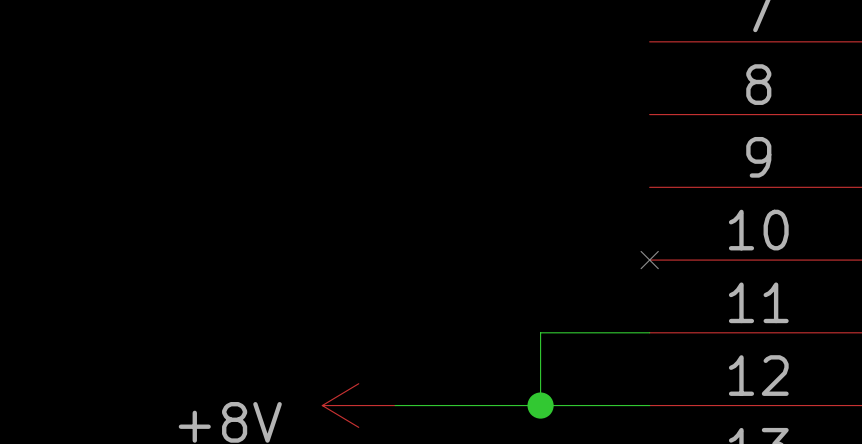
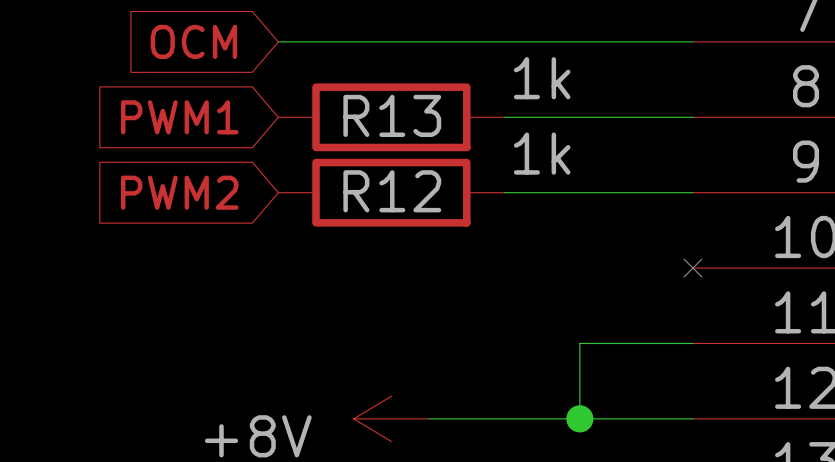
global label: none -> OCM (193, 41)
wire: none -> (278, 41) (692, 41)
global label: none -> PWM1 (179, 117)
R12: none -> 1k (391, 117)
wire: none -> (504, 117) (692, 117)
global label: none -> PWM2 (179, 192)
R13: none -> 1k (391, 192)
wire: none -> (504, 192) (692, 192)

